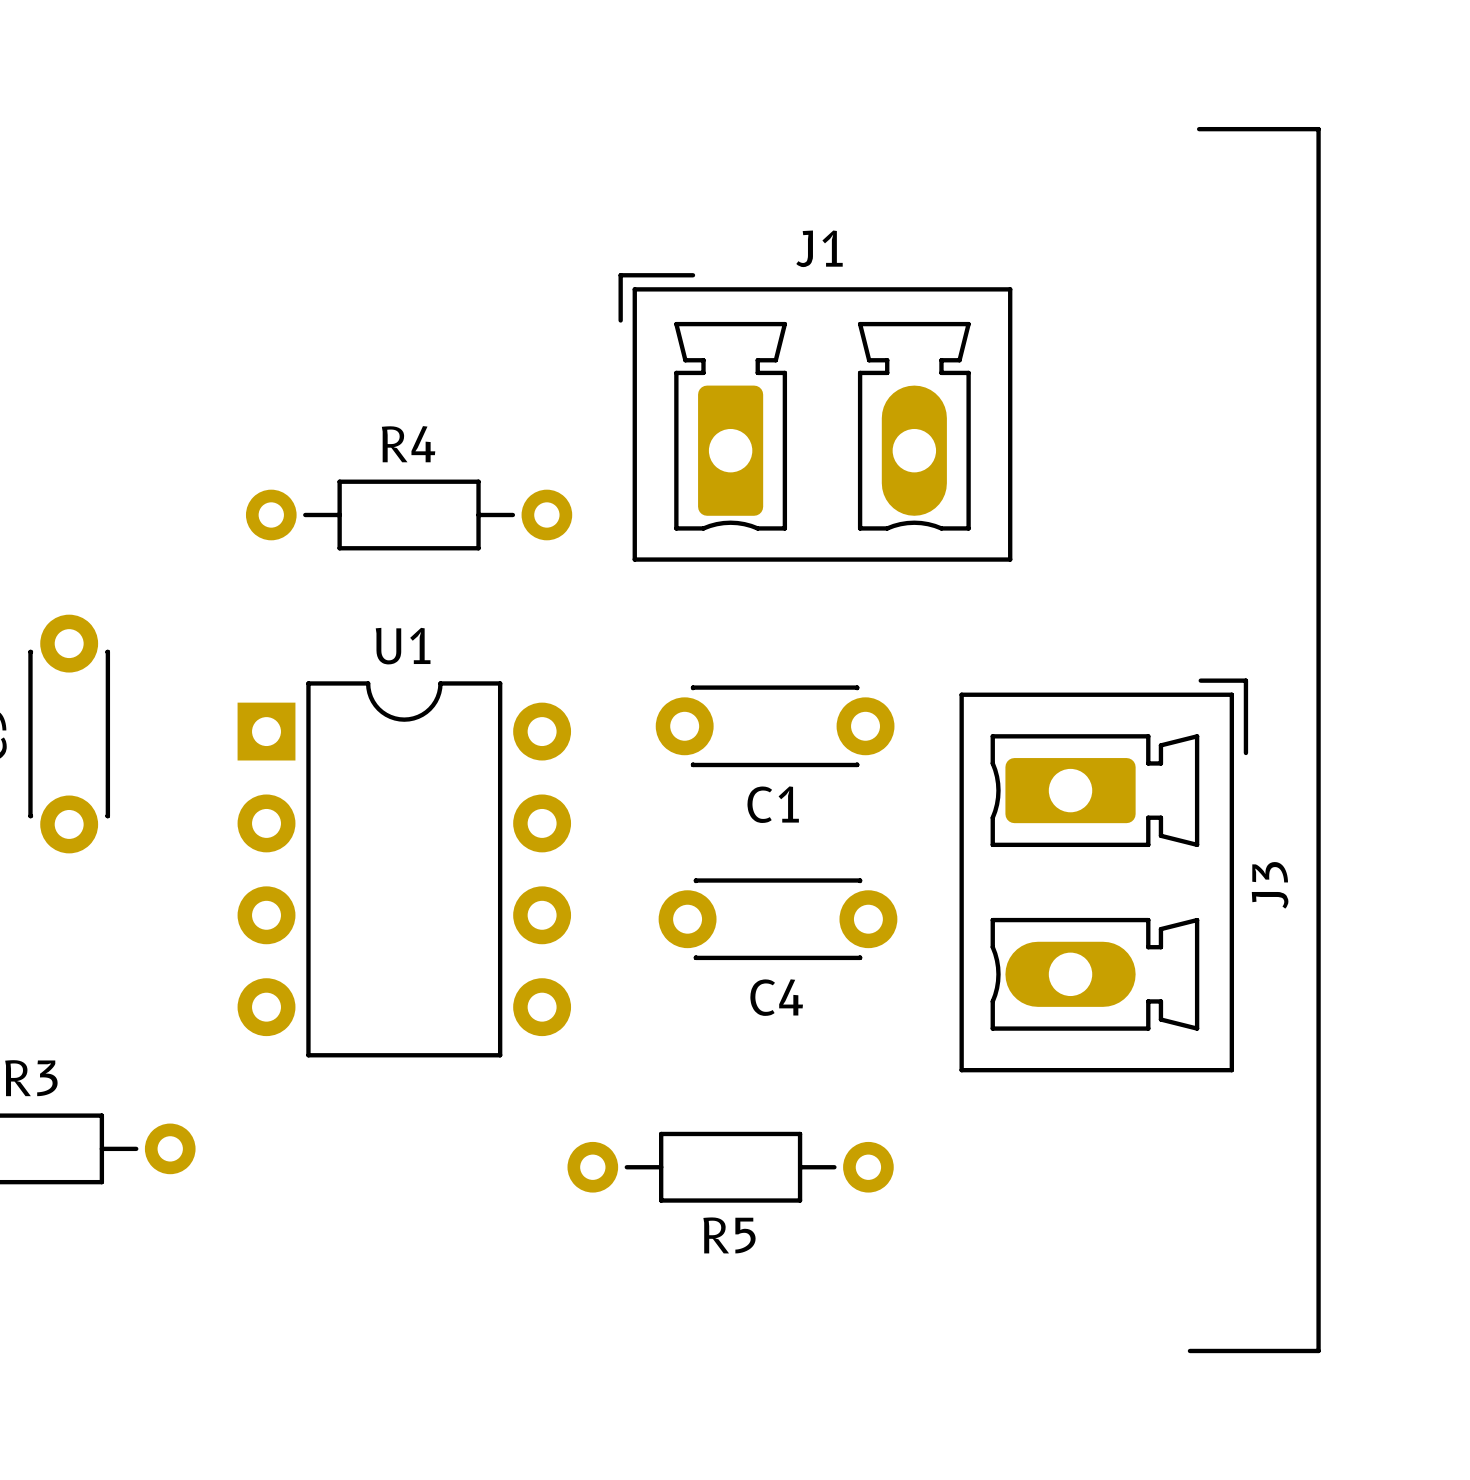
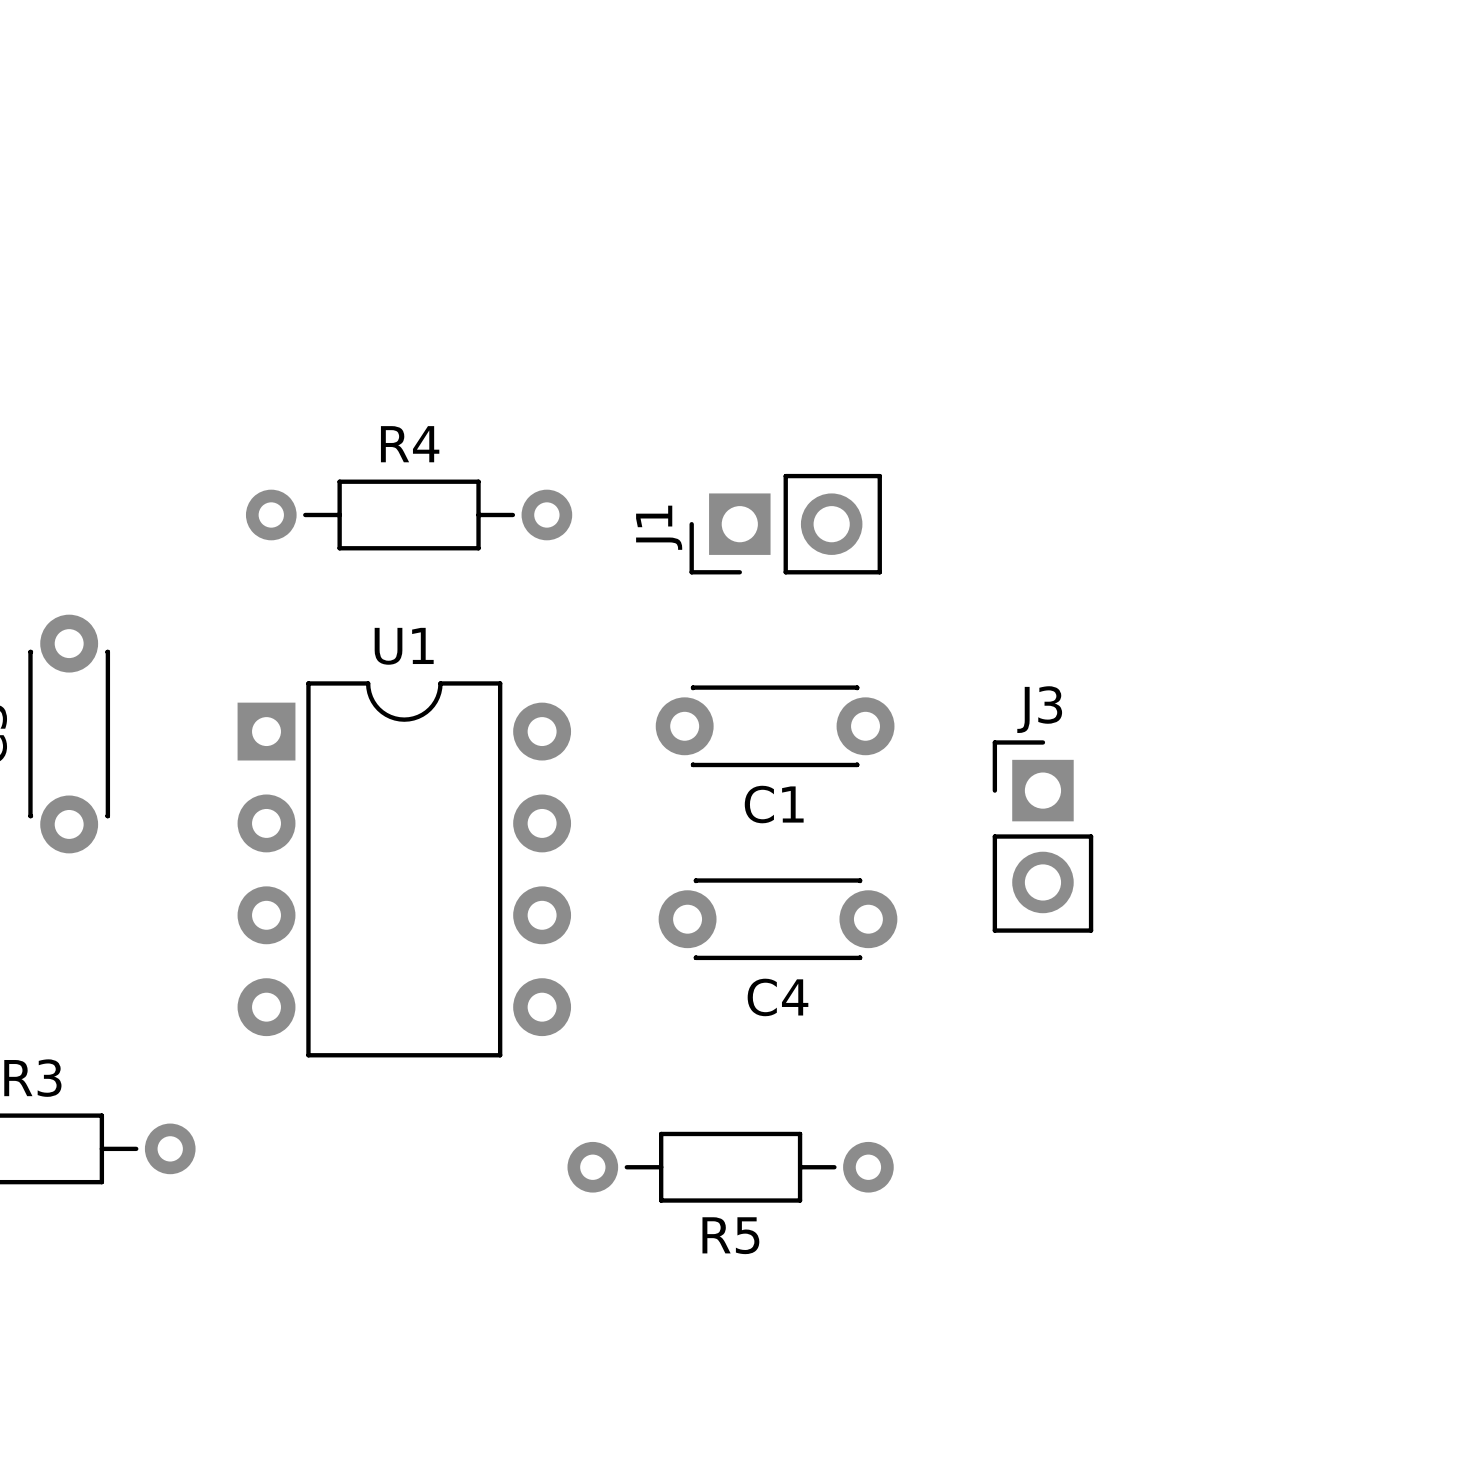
line: (1199, 129) (1318, 129) (1318, 1350) (1189, 1350) -> none
J1 name position: J1 (819, 248) -> J1 (659, 527)
J1 footprint: [618, 273, 1013, 562] -> [689, 473, 882, 575]
J3 footprint: [959, 678, 1249, 1073] -> [992, 740, 1094, 933]
J3 name position: J3 (1270, 885) -> J3 (1039, 709)

